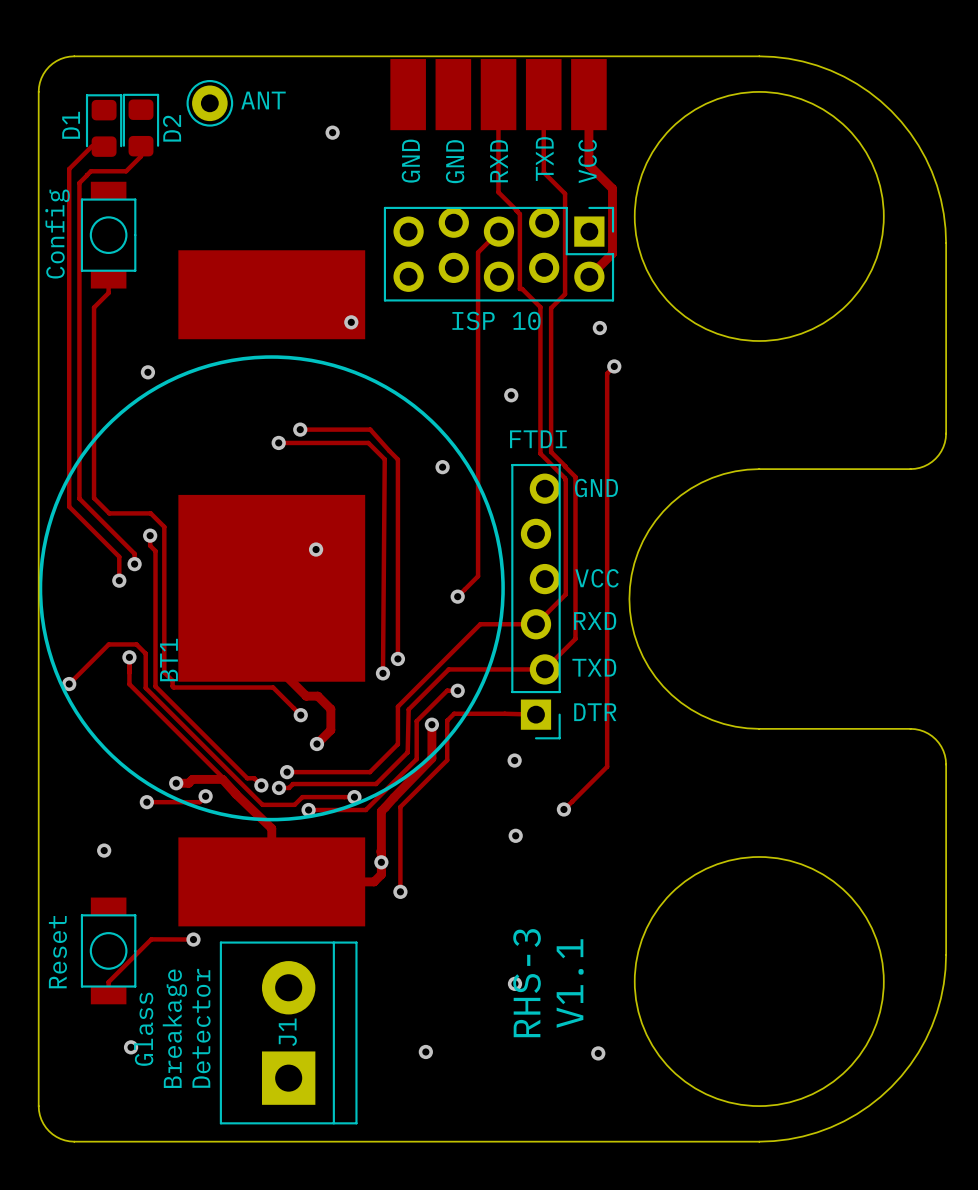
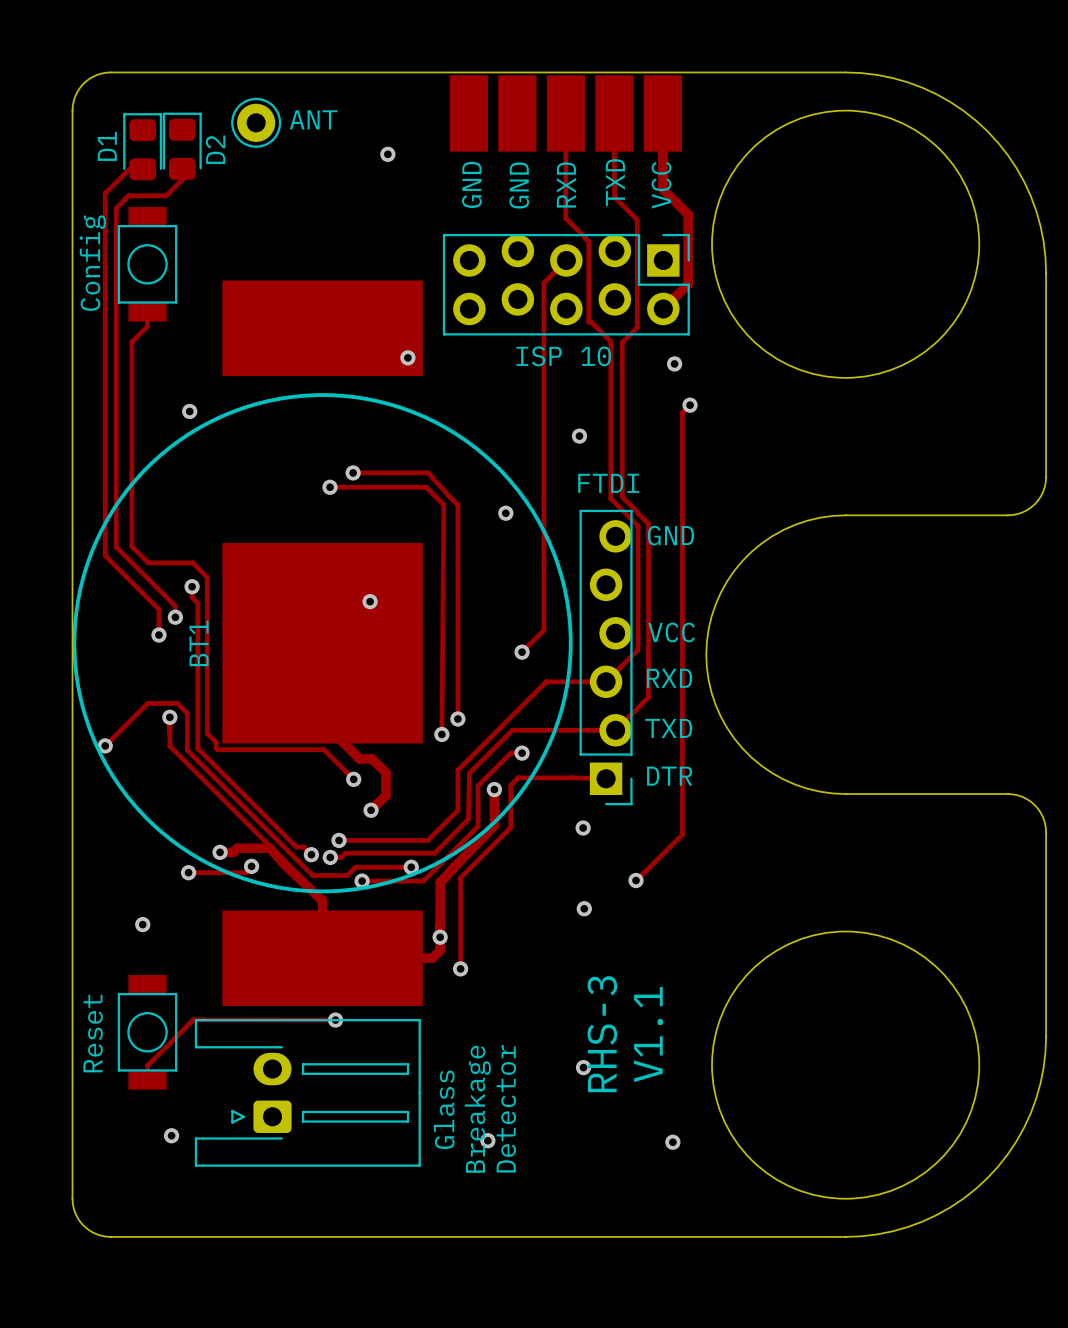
BT1 name position: BT1 (168, 660) -> BT1 (199, 643)
track: (151, 939) (193, 939) -> (193, 1019) (335, 1020)
via position: (193, 939) -> (335, 1020)
text position: RHS-3 (527, 983) -> RHS-3 (602, 1034)
text position: V1.1 (570, 983) -> V1.1 (648, 1034)
part: none -> (307, 1092)
text position: Breakage (174, 1028) -> Breakage (477, 1109)
text position: Detector (201, 1028) -> Detector (506, 1108)
text position: Glass (143, 1029) -> Glass (444, 1109)
J1: (288, 1032) -> none

